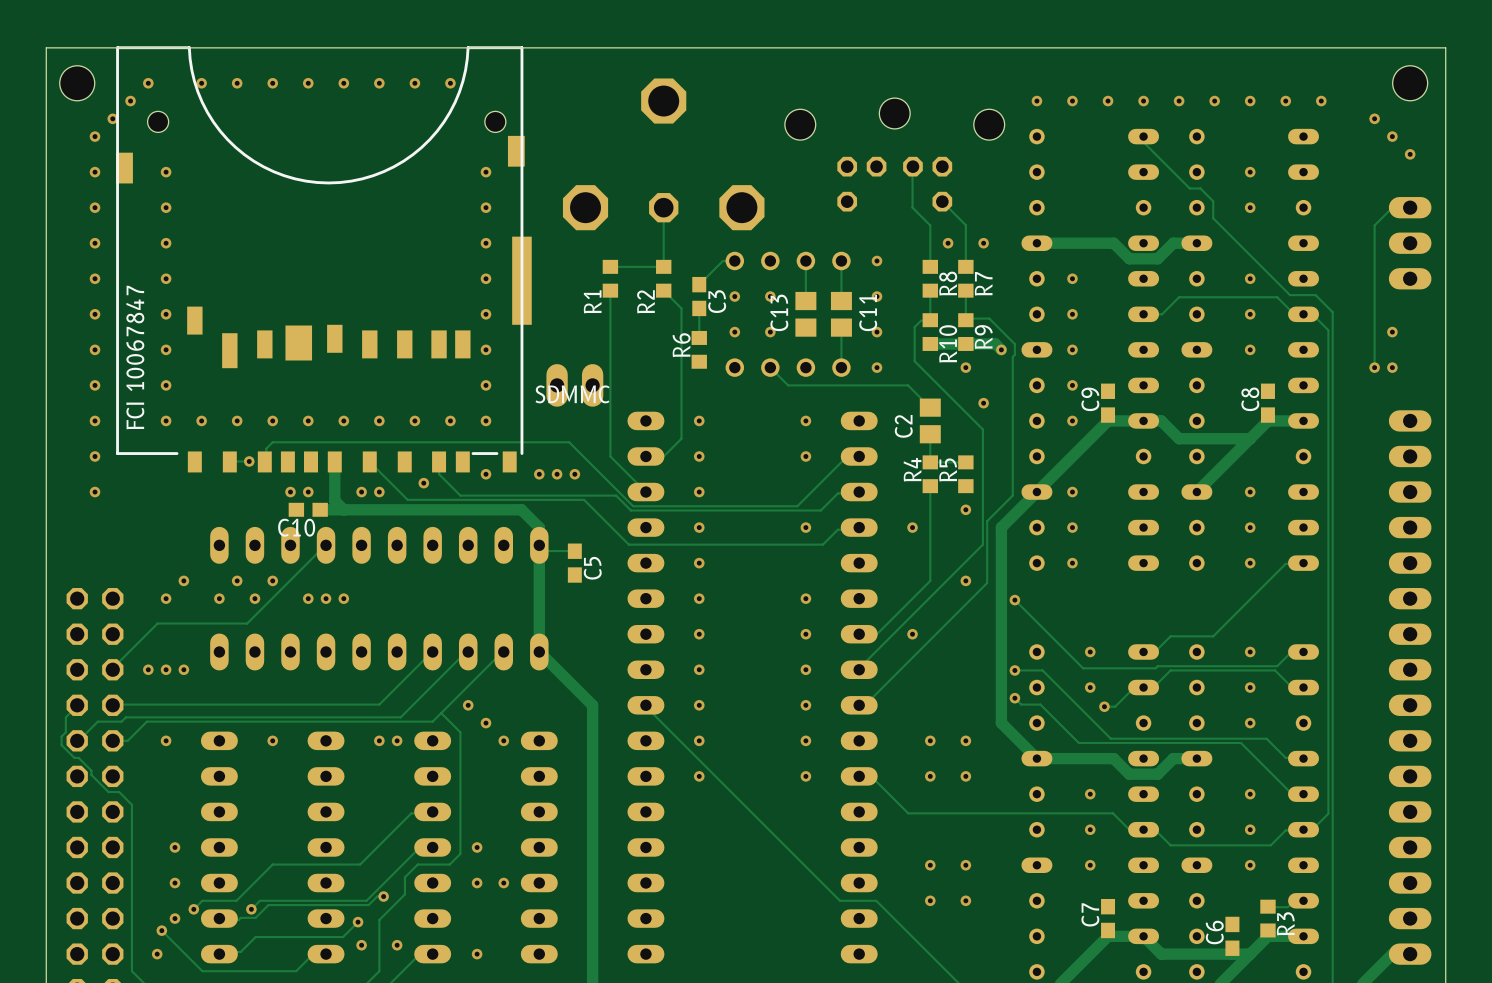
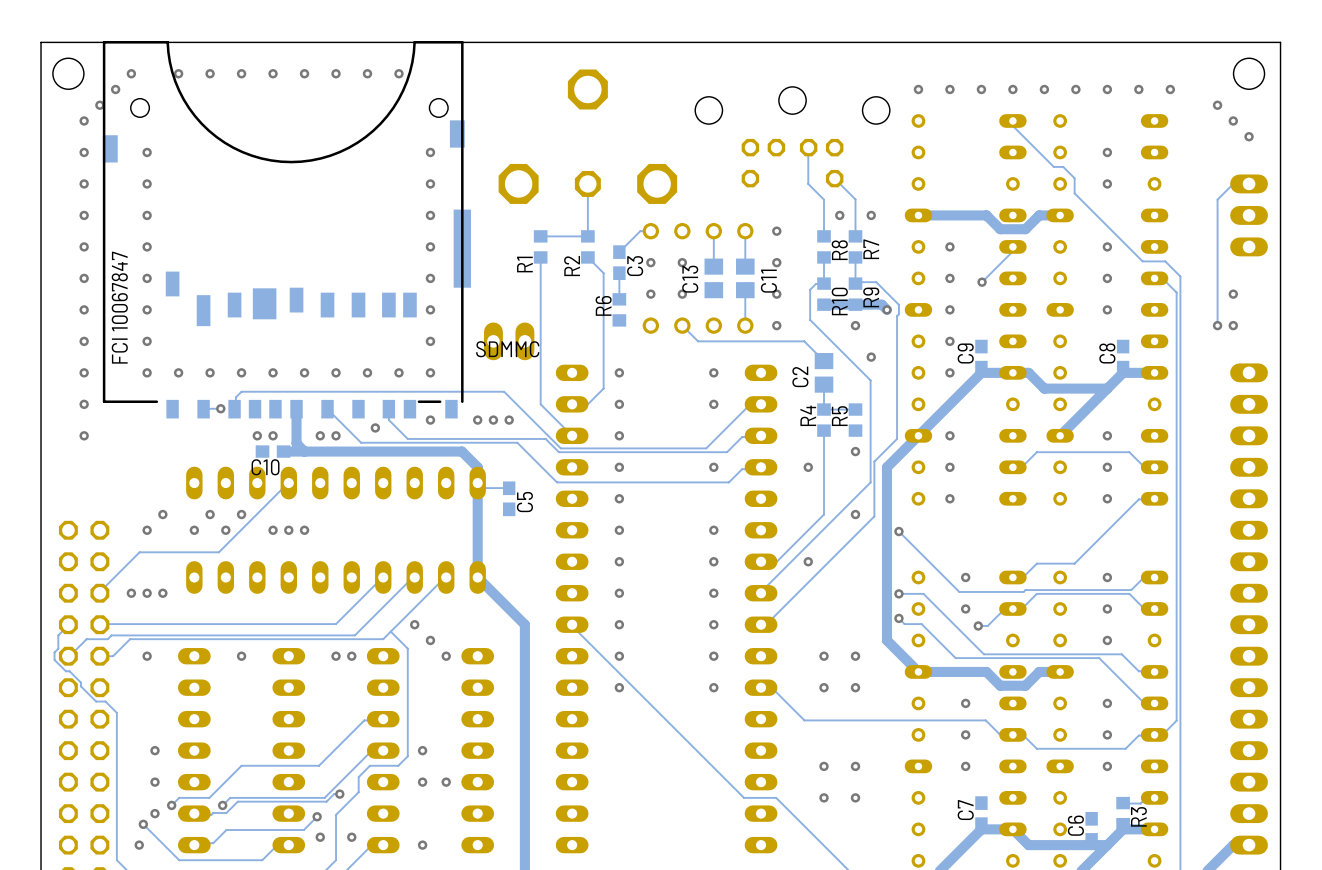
track: none -> (1012, 246) (1012, 251) (982, 282)
track: (1303, 314) (1294, 314) (1277, 297) (1179, 297) (1162, 314) (1143, 314) -> none
via: none -> (982, 282)
track: none -> (1154, 467) (1144, 467) (1129, 452) (1036, 452) (1021, 467) (1012, 467)

